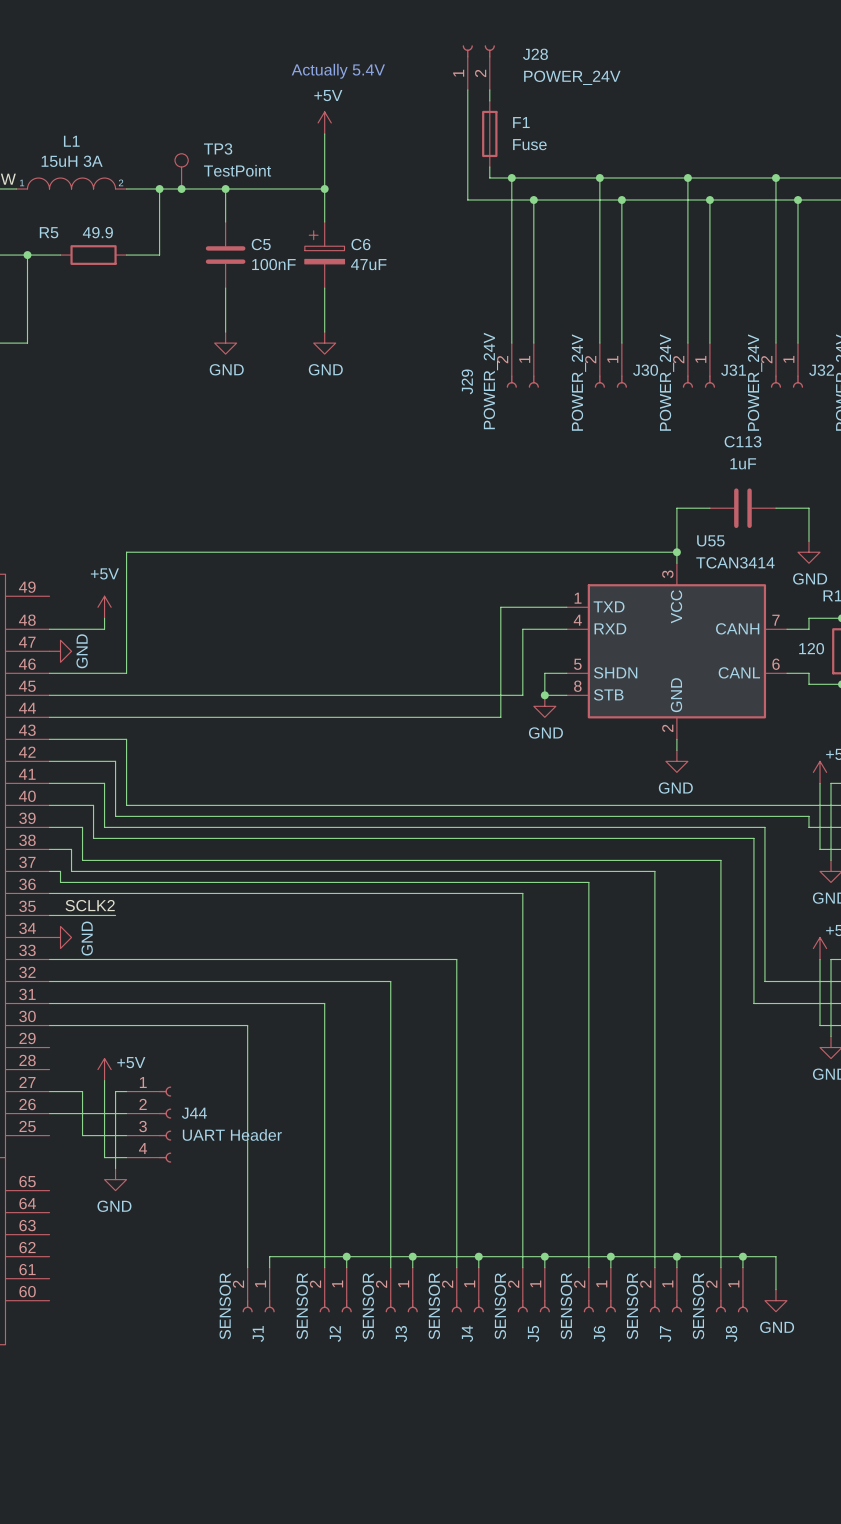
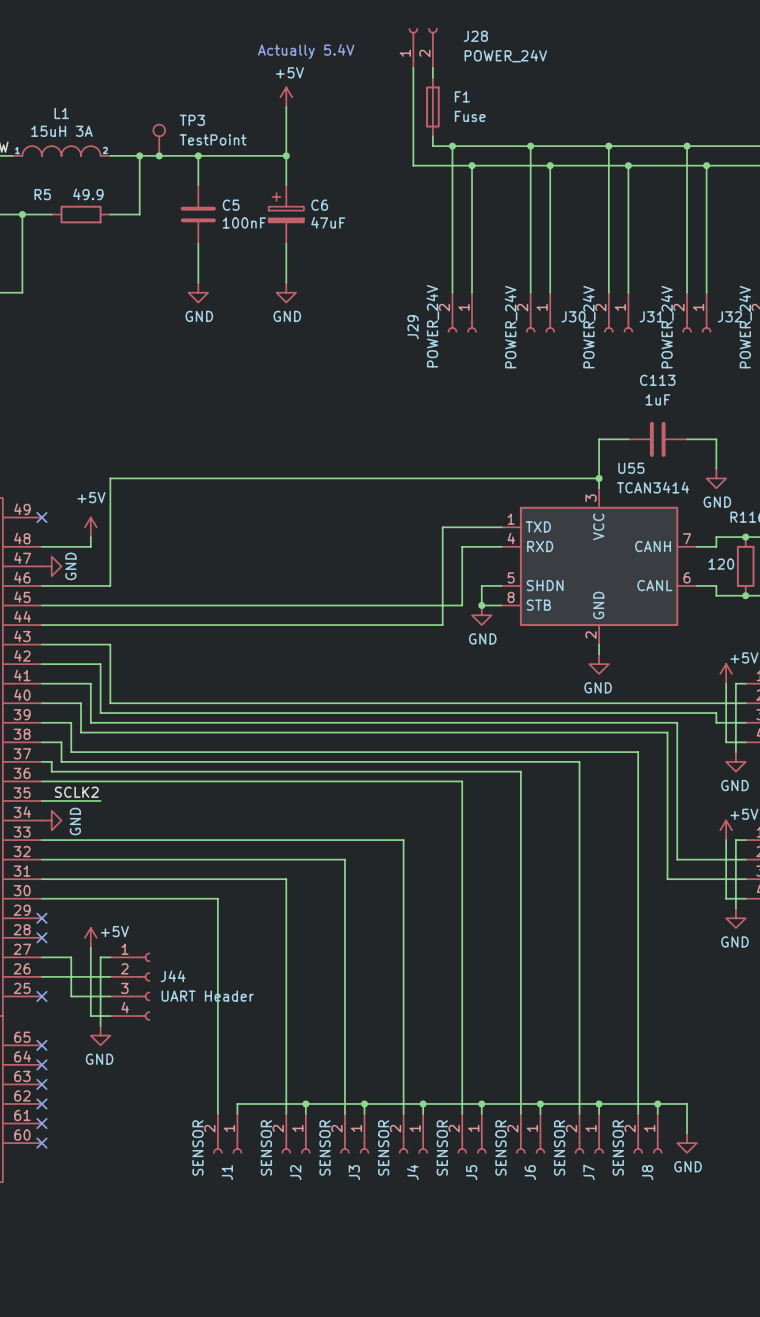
no-connect mark: none -> (41, 517)
no-connect mark: none -> (41, 918)
no-connect mark: none -> (41, 937)
no-connect mark: none -> (41, 996)
no-connect mark: none -> (41, 1045)
no-connect mark: none -> (41, 1064)
no-connect mark: none -> (41, 1084)
no-connect mark: none -> (41, 1103)
no-connect mark: none -> (41, 1123)
no-connect mark: none -> (41, 1143)

